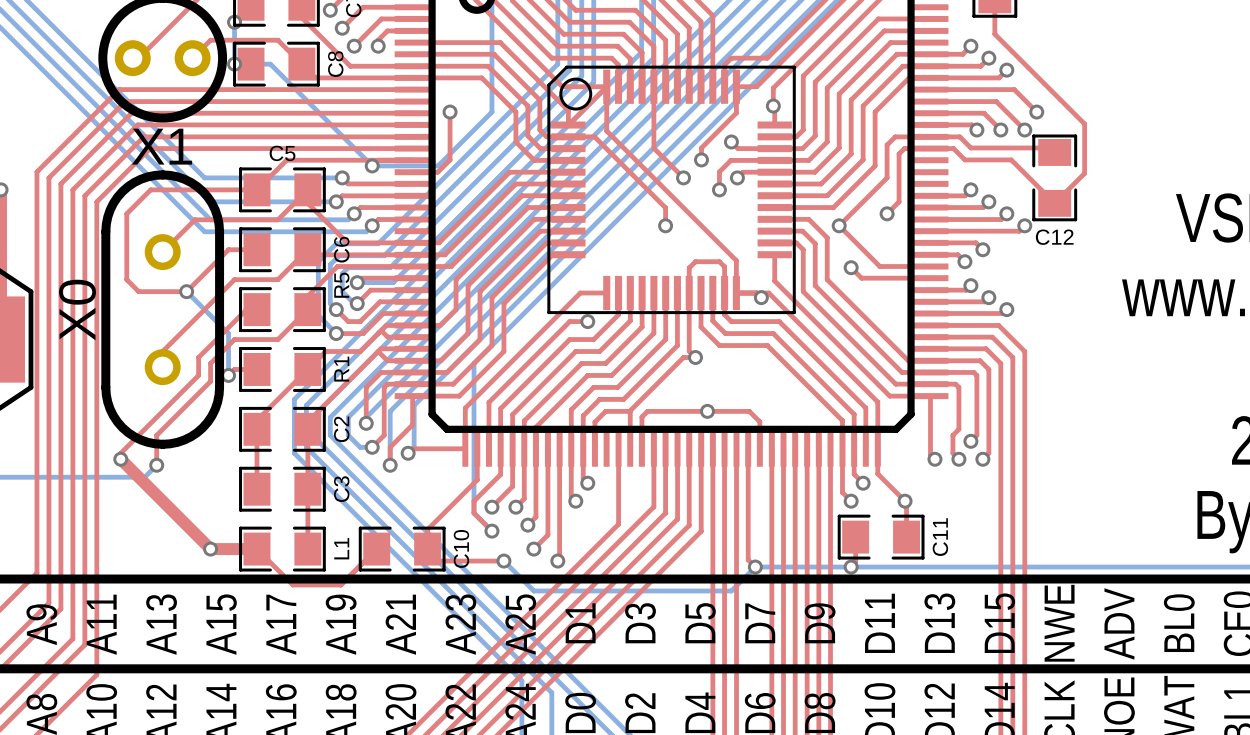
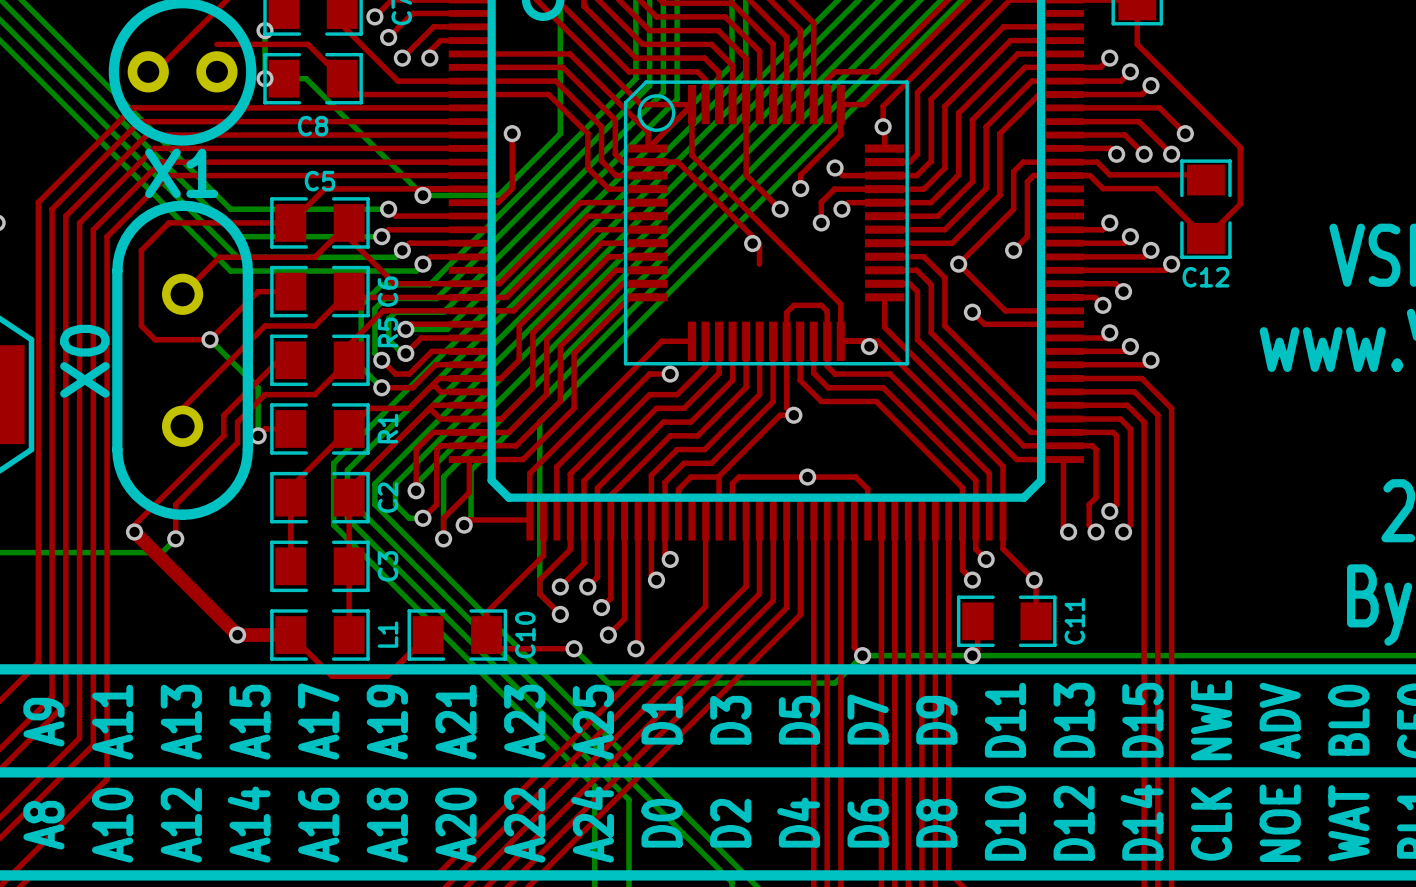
top track: (277, 40) (210, 40) (192, 58) -> (314, 51) (307, 44) (216, 44)
C8 name rotation: 0° (335, 64) -> 90° clockwise (313, 126)
C8 name position: C8 (335, 64) -> C8 (313, 126)
via position: (665, 225) -> (752, 243)

